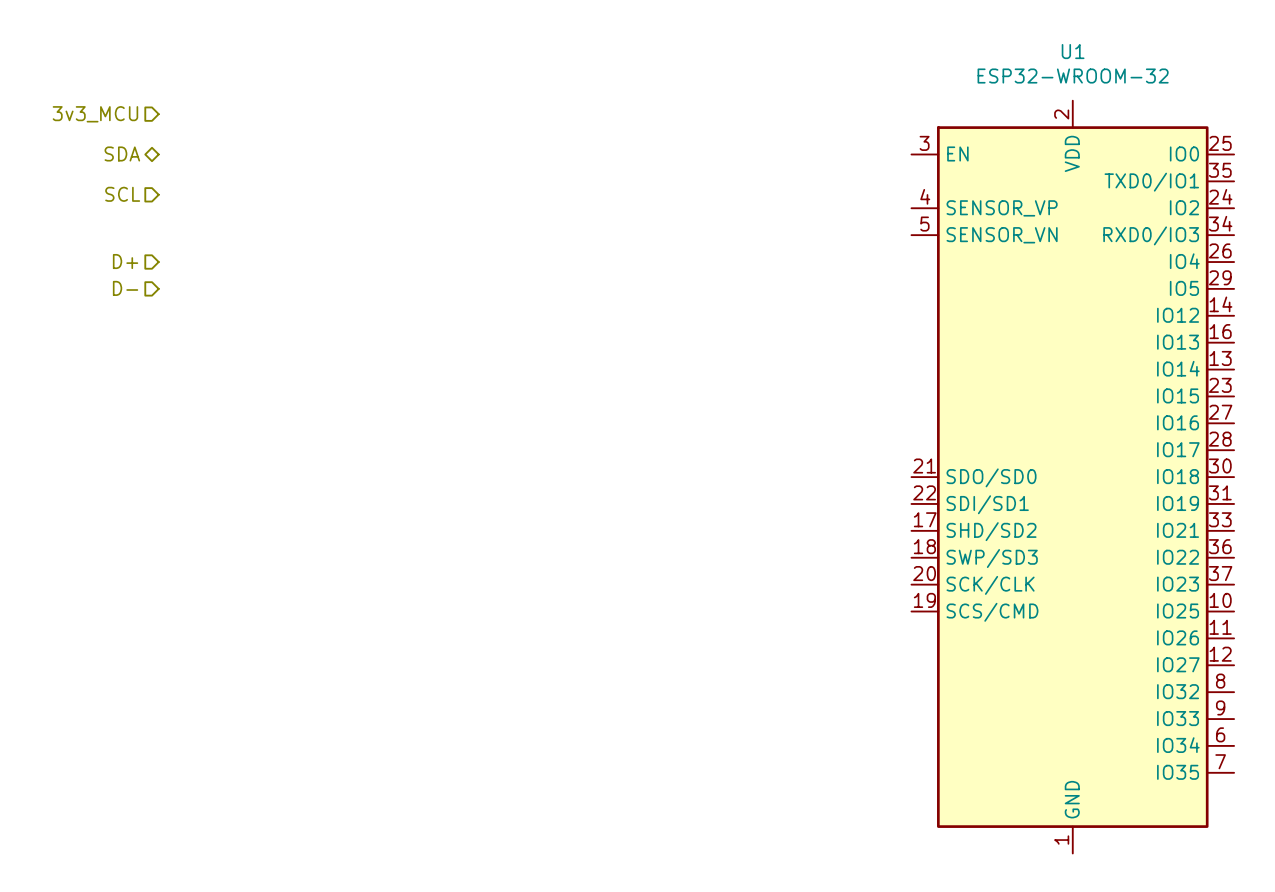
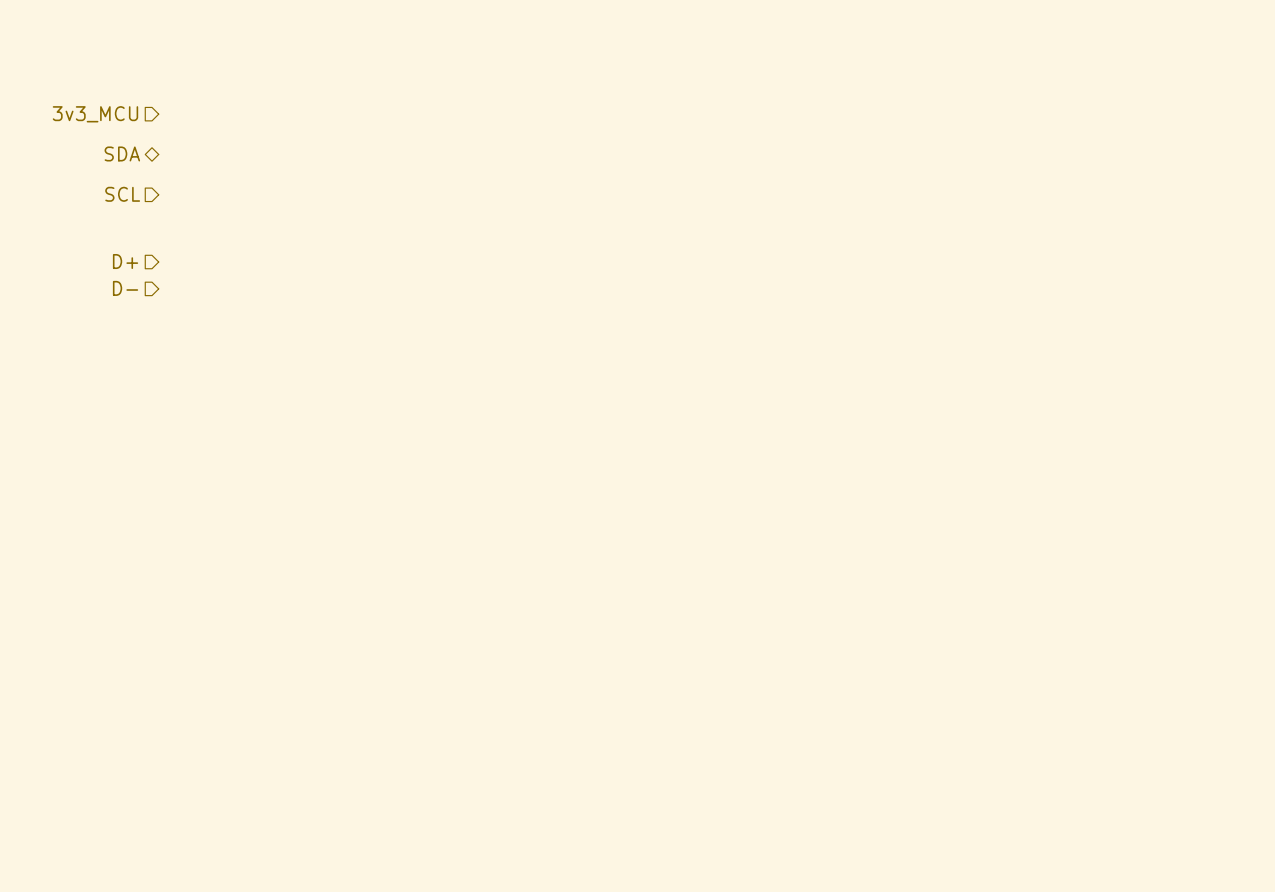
U1: ESP32-WROOM-32 (1072, 477) -> none

